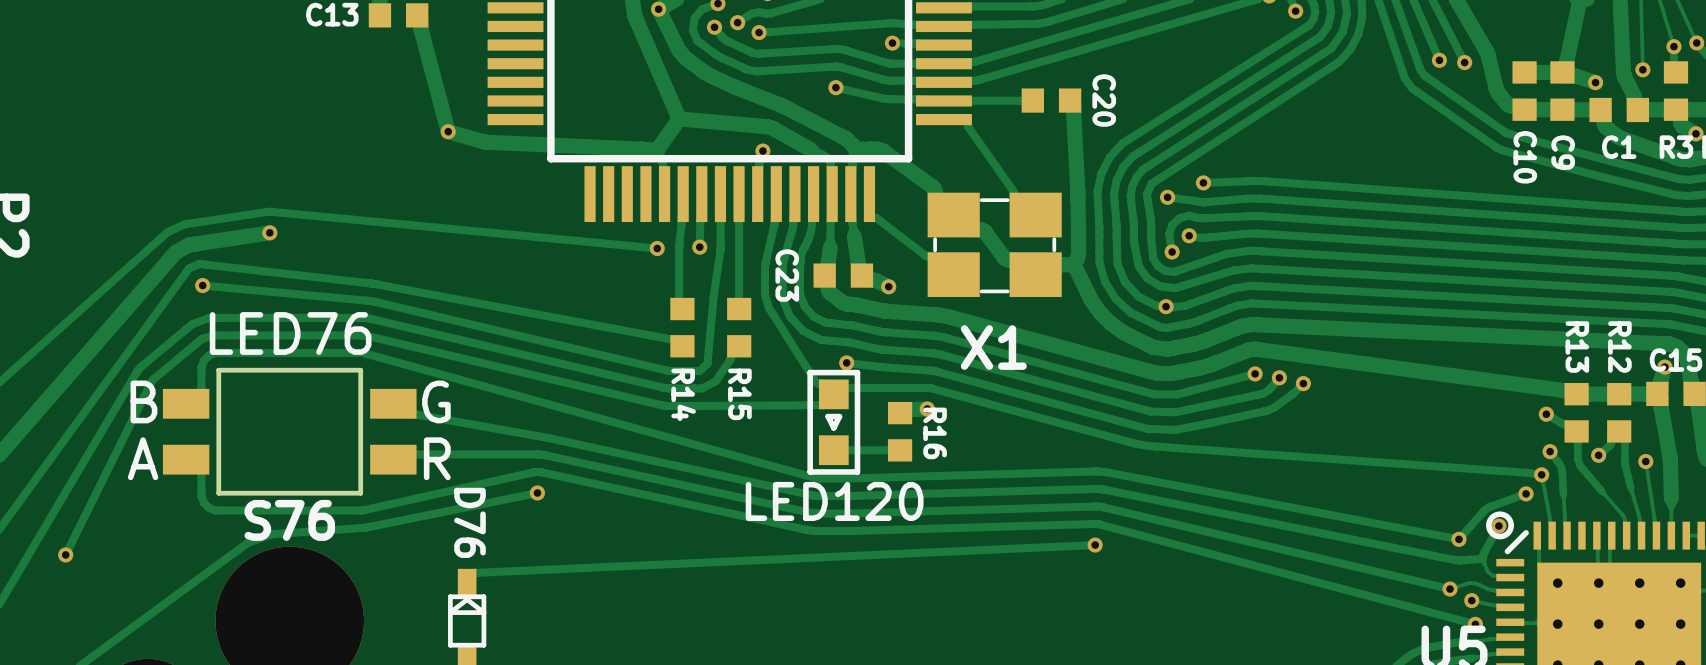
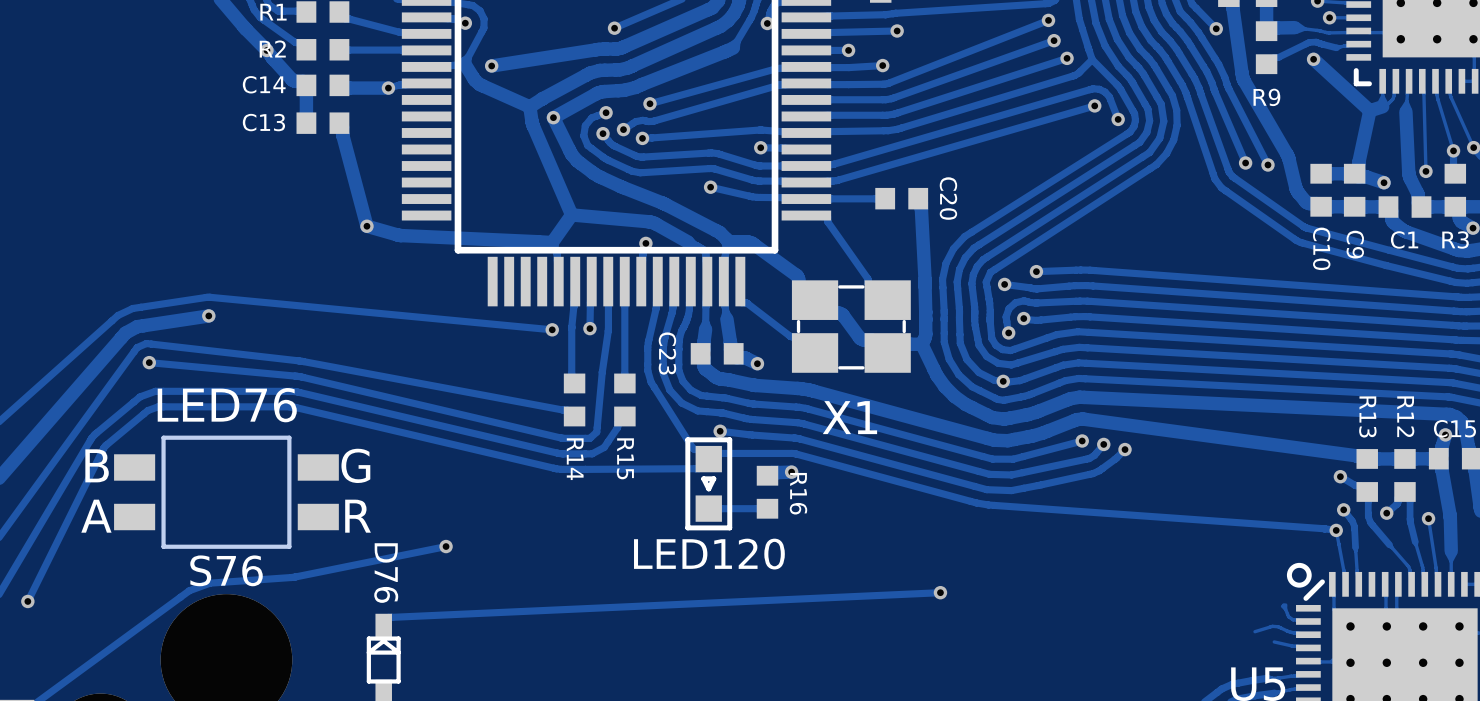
track: (186, 403) (201, 392) (201, 366) (208, 355) (215, 352) (361, 352) (816, 478) (848, 478) -> none
track: (417, 414) (549, 438) (817, 496) (1103, 489) (1459, 560) (1482, 558) (1498, 526) -> none
track: (186, 459) (201, 470) (201, 496) (204, 502) (215, 510) (363, 510) (539, 471) (815, 531) (1099, 524) (1475, 624) -> none
track: (393, 459) (412, 454) (543, 454) (816, 513) (1101, 506) (1450, 589) -> none
track: (849, 478) (1105, 472) (1458, 539) (1489, 507) (1526, 493) -> none
via: (1526, 493) -> none
via: (1498, 526) -> none
via: (1458, 539) -> none
via: (1450, 589) -> none
via: (1471, 600) -> none
via: (1475, 624) -> none

